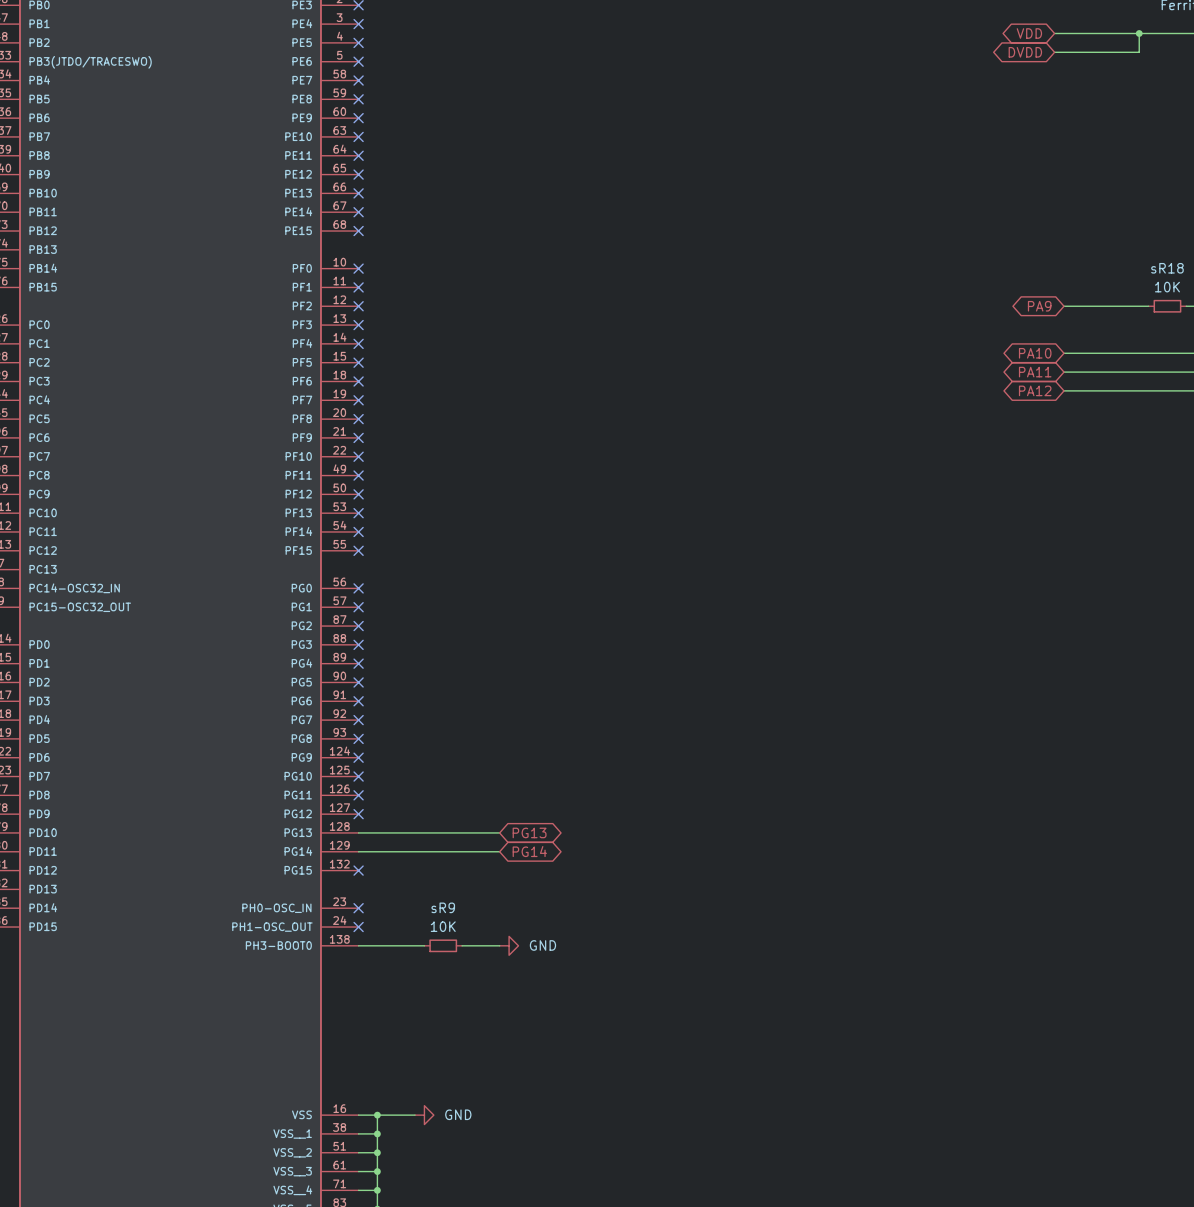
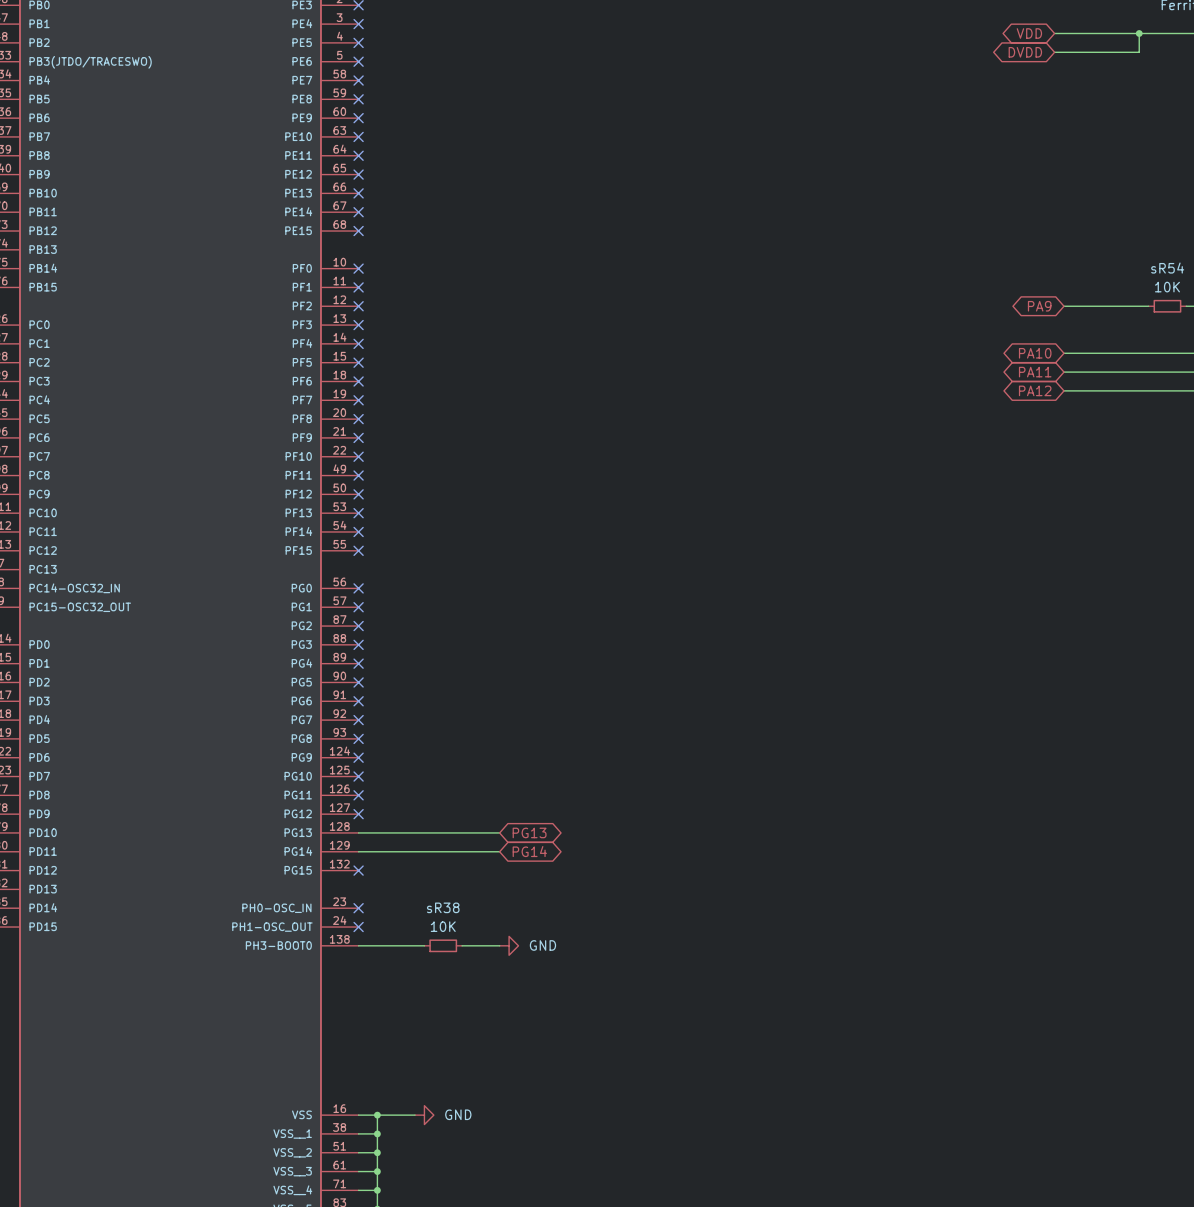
sR18 name: sR18 (1167, 268) -> sR54 (1167, 268)
sR9 name: sR9 (443, 907) -> sR38 (443, 907)

